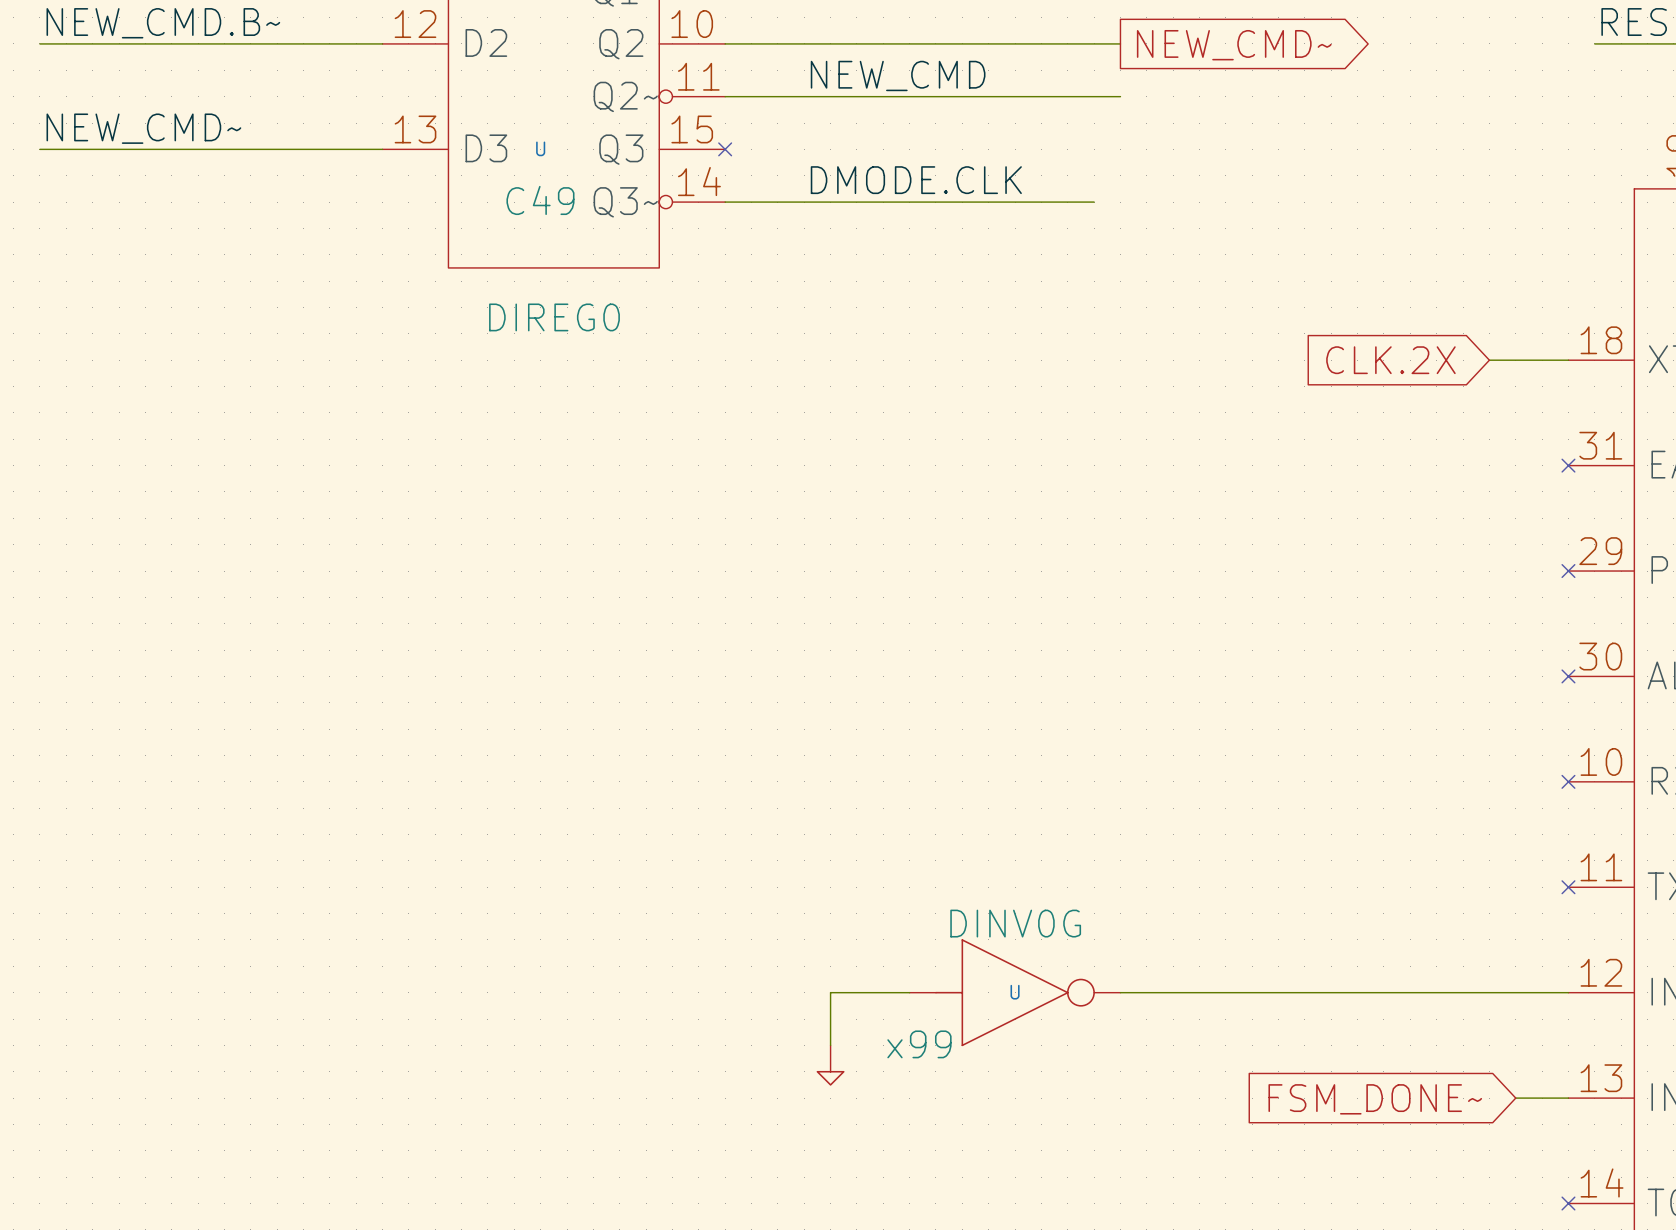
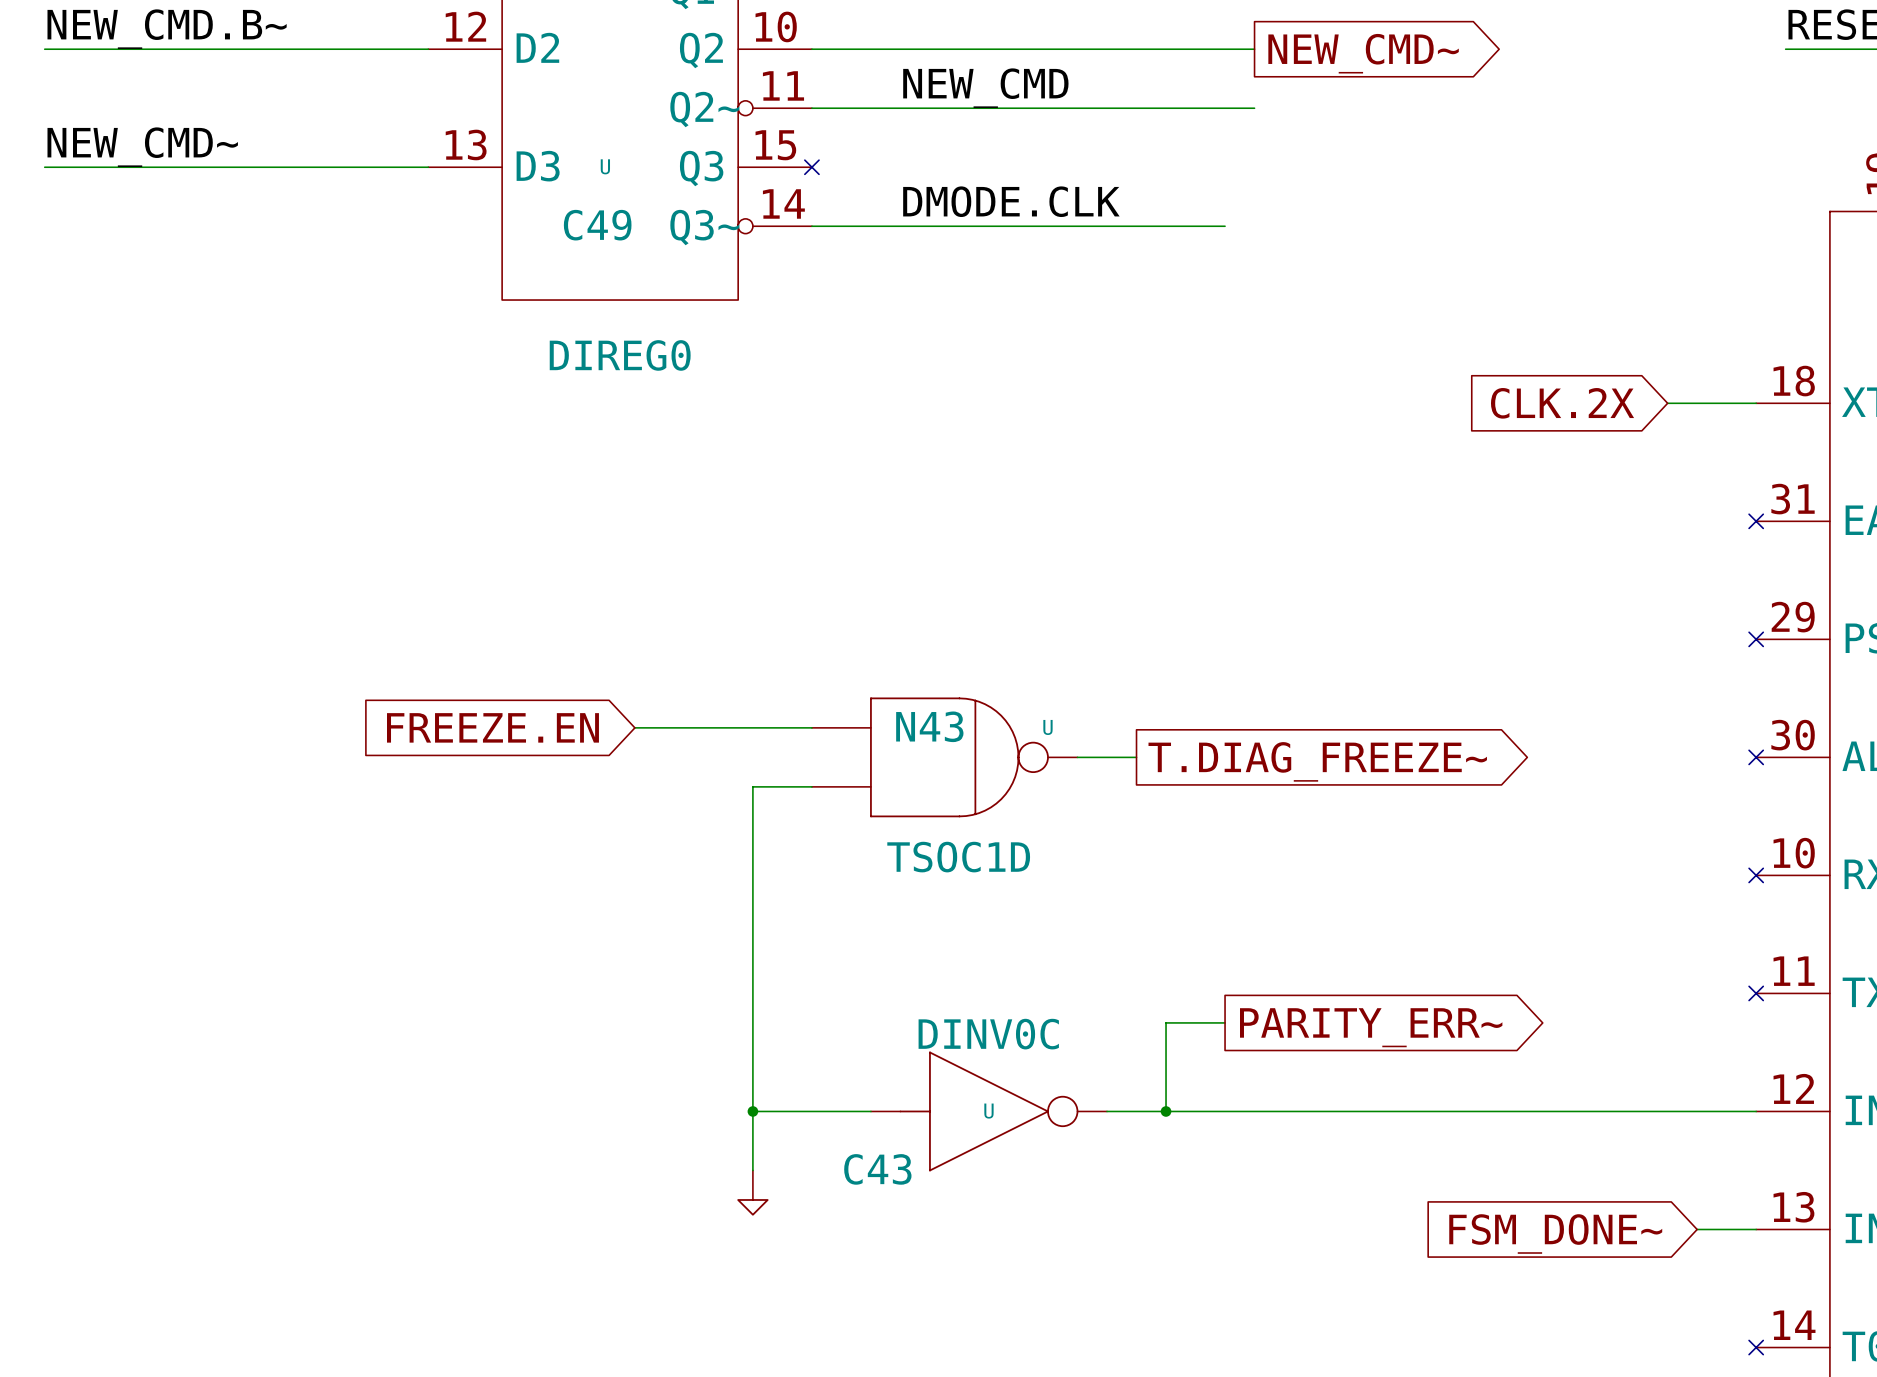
global label: none -> FREEZE.EN (492, 727)
wire: none -> (634, 727) (811, 727)
U: none -> (944, 757)
wire: none -> (1077, 757) (1136, 757)
global label: none -> T.DIAG_FREEZE~ (1317, 761)
wire: none -> (811, 786) (752, 786) (752, 1170)
wire: none -> (1225, 1022) (1166, 1022) (1166, 1111)
global label: none -> PARITY_ERR~ (1371, 1027)
wire: none -> (752, 1111) (870, 1111)
junction: none -> (752, 1111)
U: none -> (988, 1111)
wire: (909, 992) (830, 992) (830, 1045) -> none
wire: none -> (1107, 1111) (1254, 1111)
U: (1015, 992) -> none
junction: none -> (1166, 1111)
power symbol position: (830, 1065) -> (752, 1193)

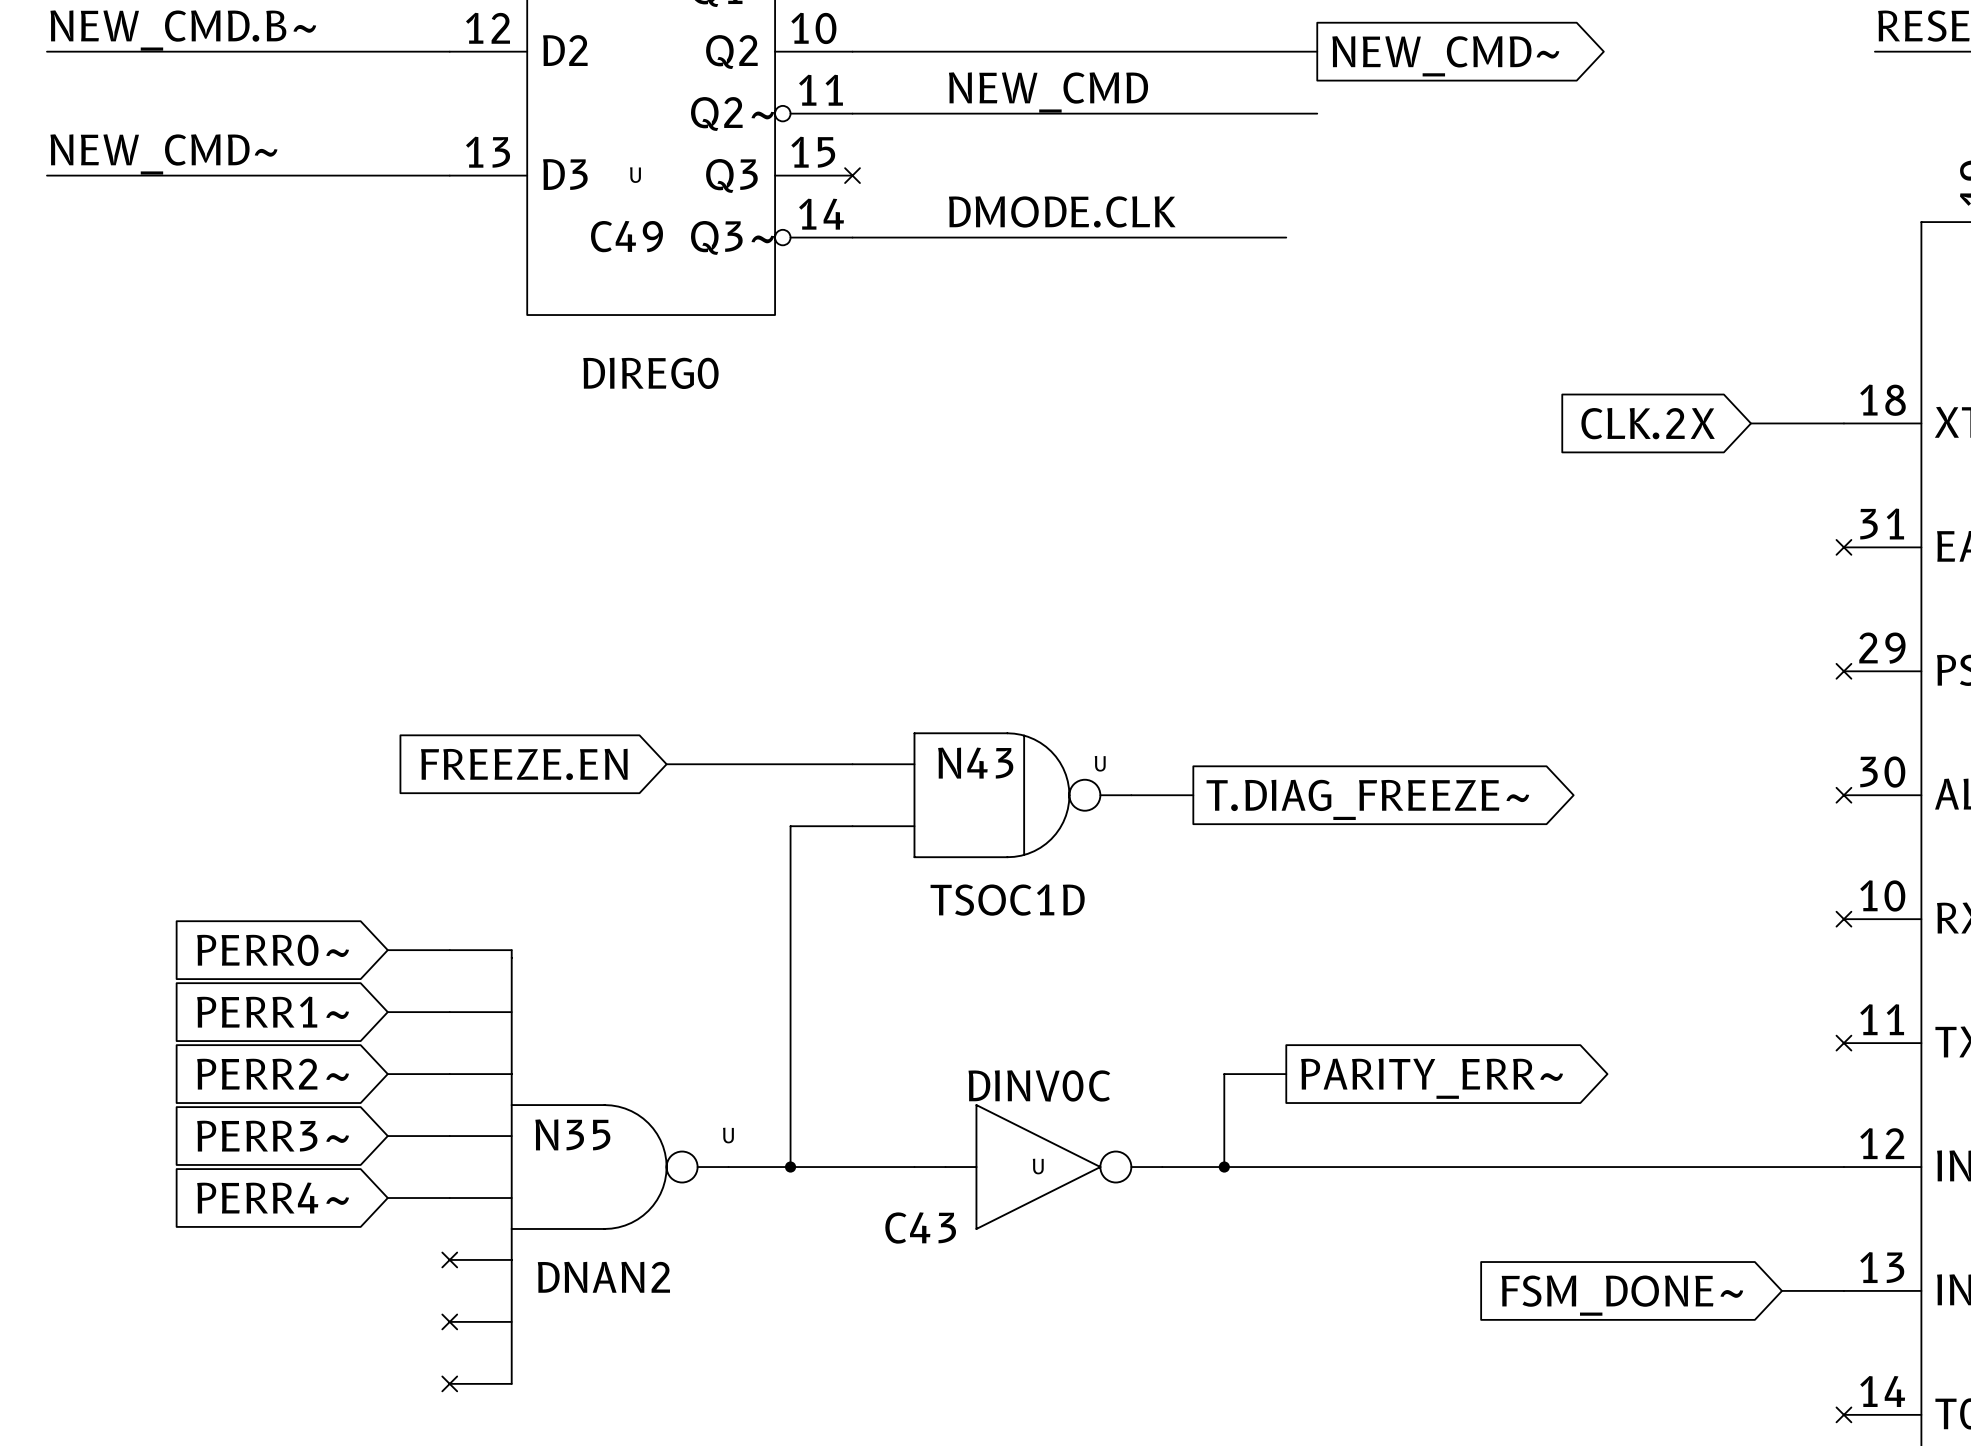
global label: none -> PERR0~ (273, 950)
wire: none -> (387, 950) (449, 950)
global label: none -> PERR1~ (273, 1012)
wire: none -> (387, 1012) (449, 1012)
global label: none -> PERR2~ (273, 1074)
wire: none -> (387, 1074) (449, 1074)
global label: none -> PERR3~ (273, 1136)
wire: none -> (387, 1136) (449, 1136)
U: none -> (589, 1167)
wire: (752, 1111) (752, 1170) -> (790, 1167) (728, 1167)
global label: none -> PERR4~ (273, 1198)
wire: none -> (387, 1198) (449, 1198)
power symbol: (752, 1193) -> none
no-connect mark: none -> (449, 1259)
no-connect mark: none -> (449, 1321)
no-connect mark: none -> (449, 1383)

